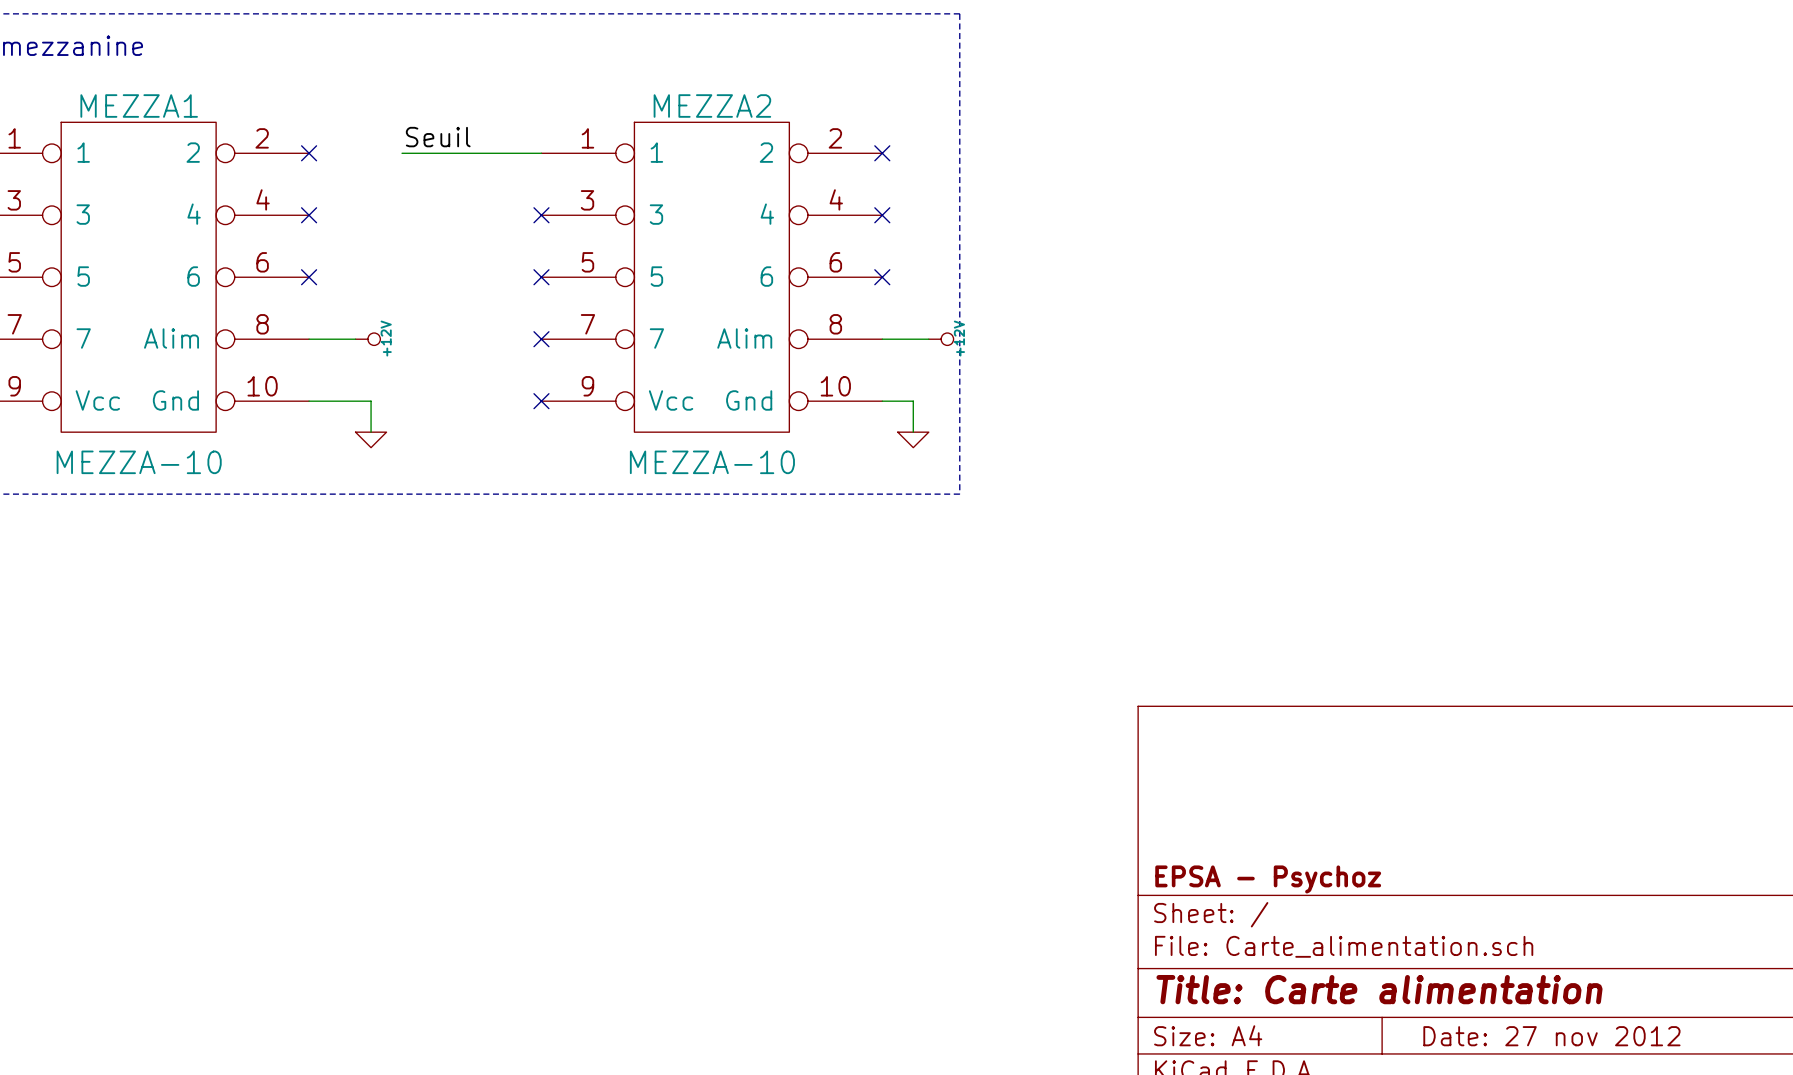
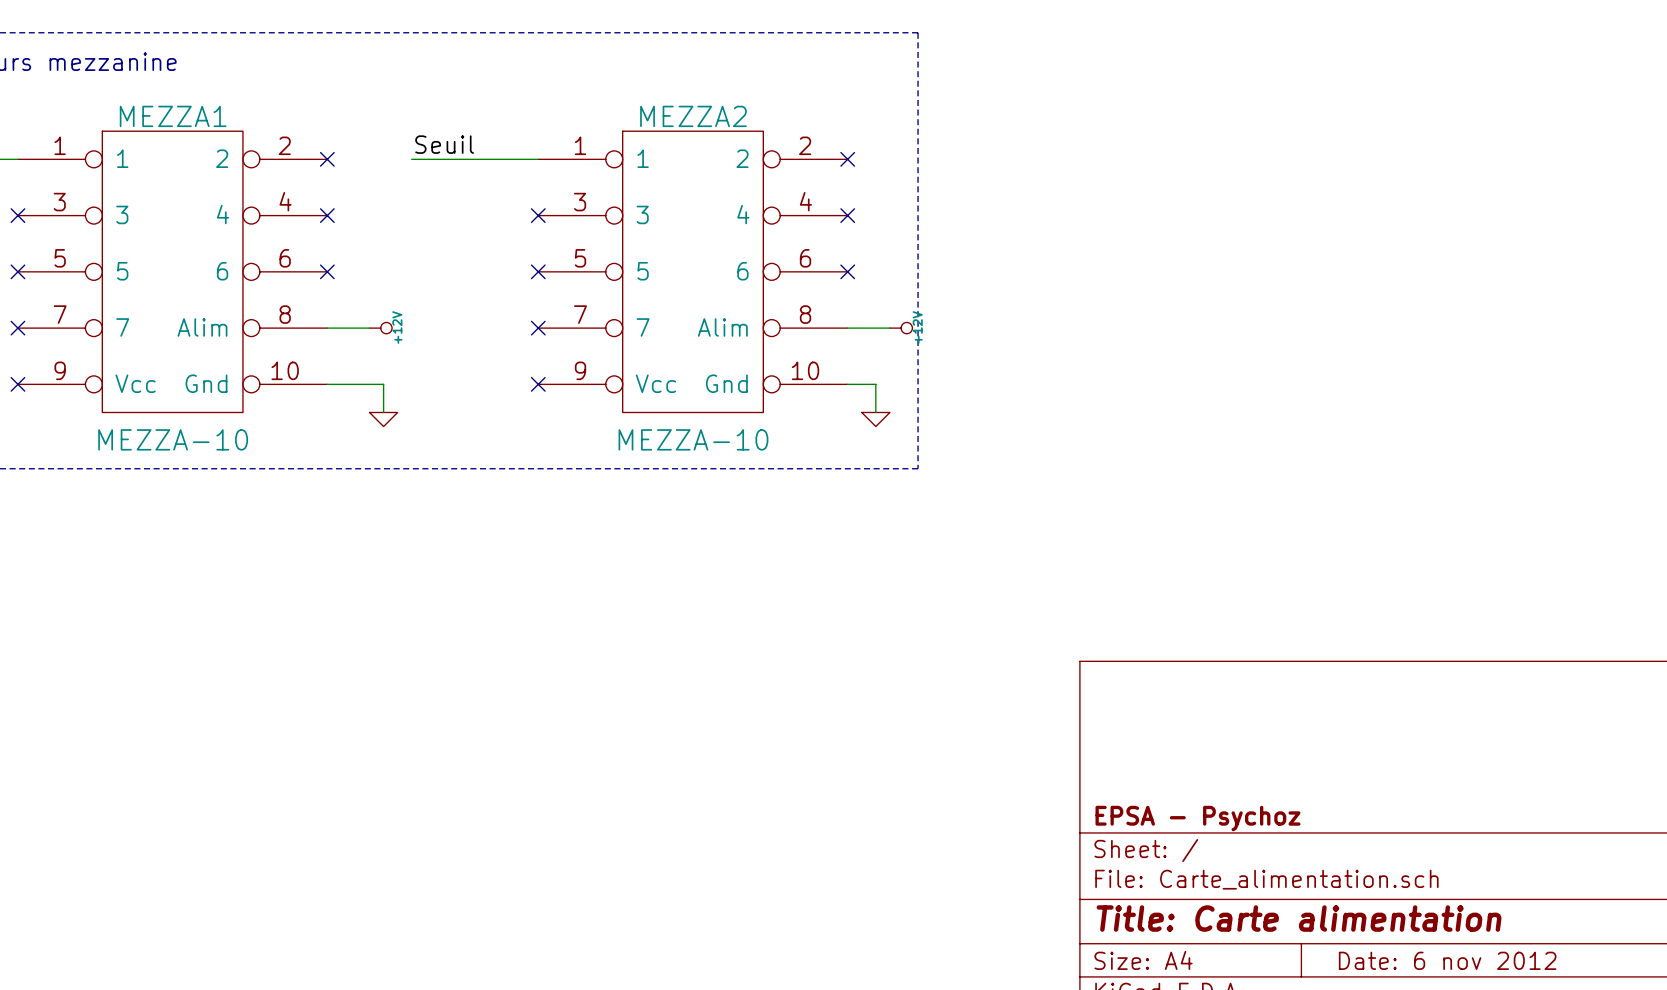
title block: Date: 27 nov 2012 (1551, 1036) -> Date: 6 nov 2012 (1447, 960)

